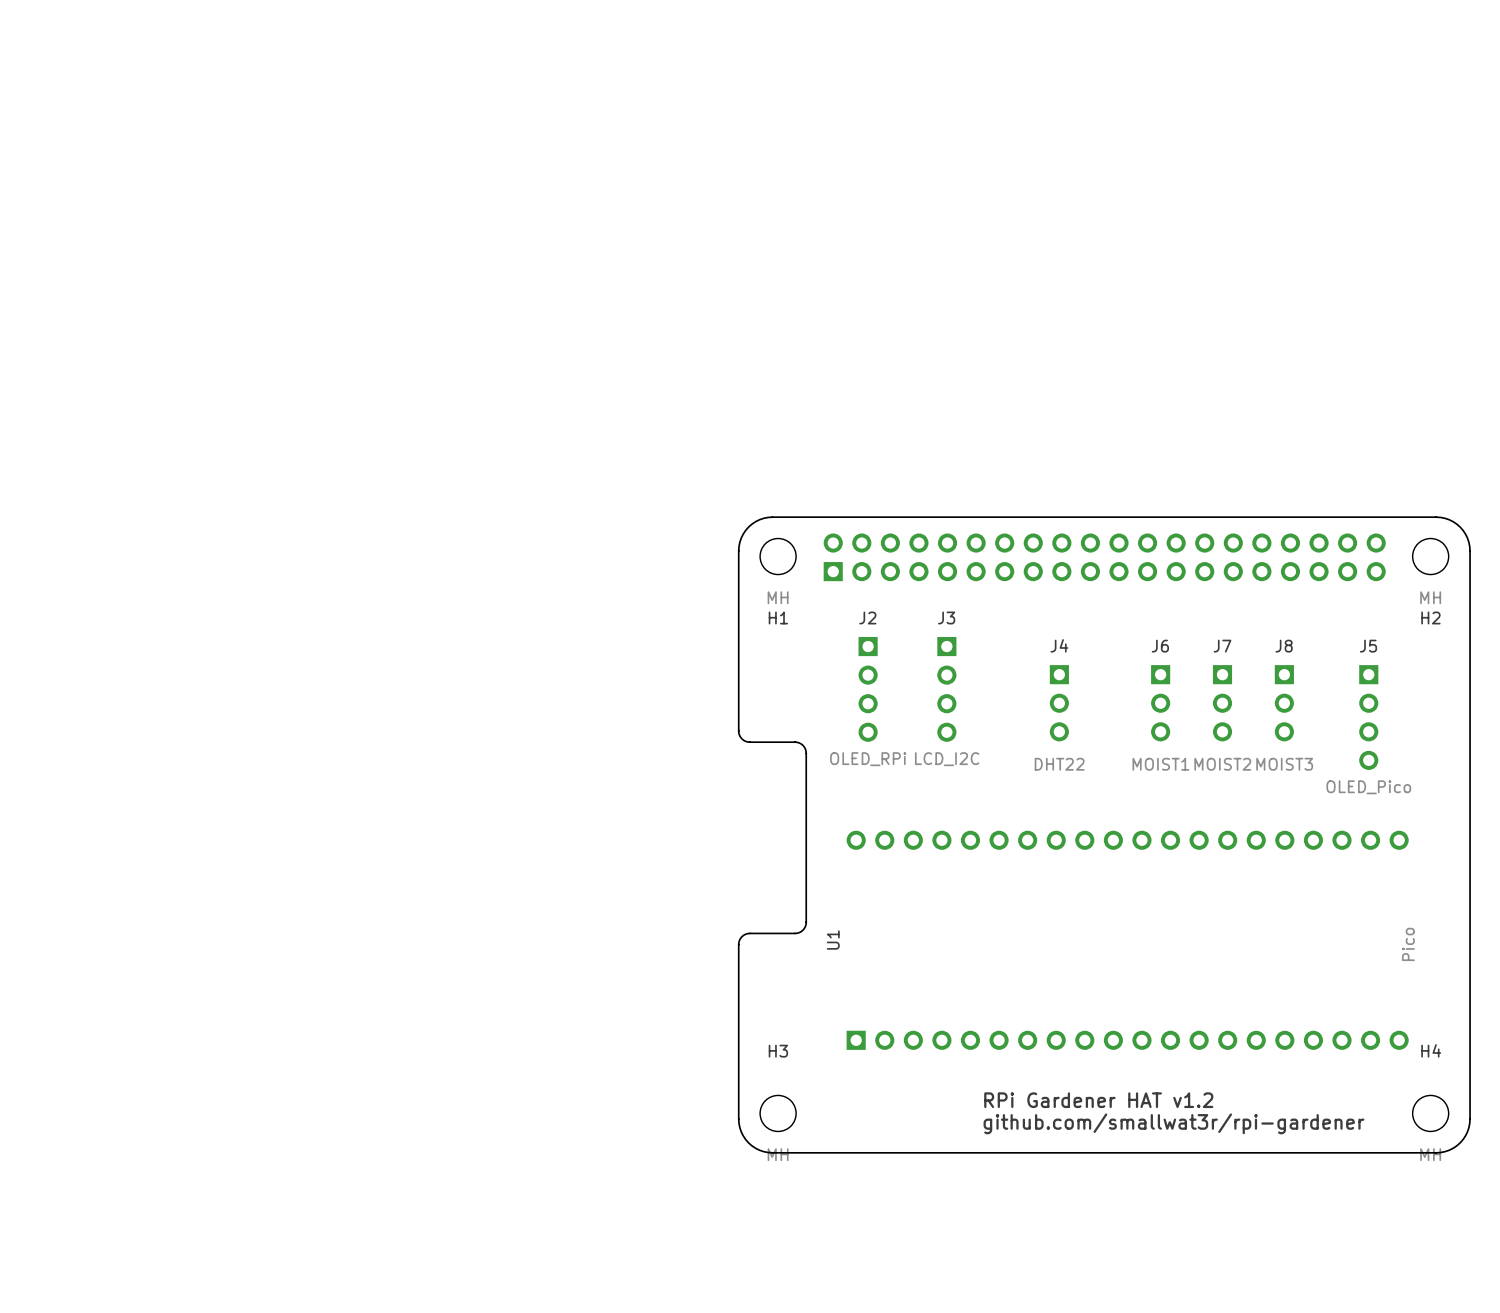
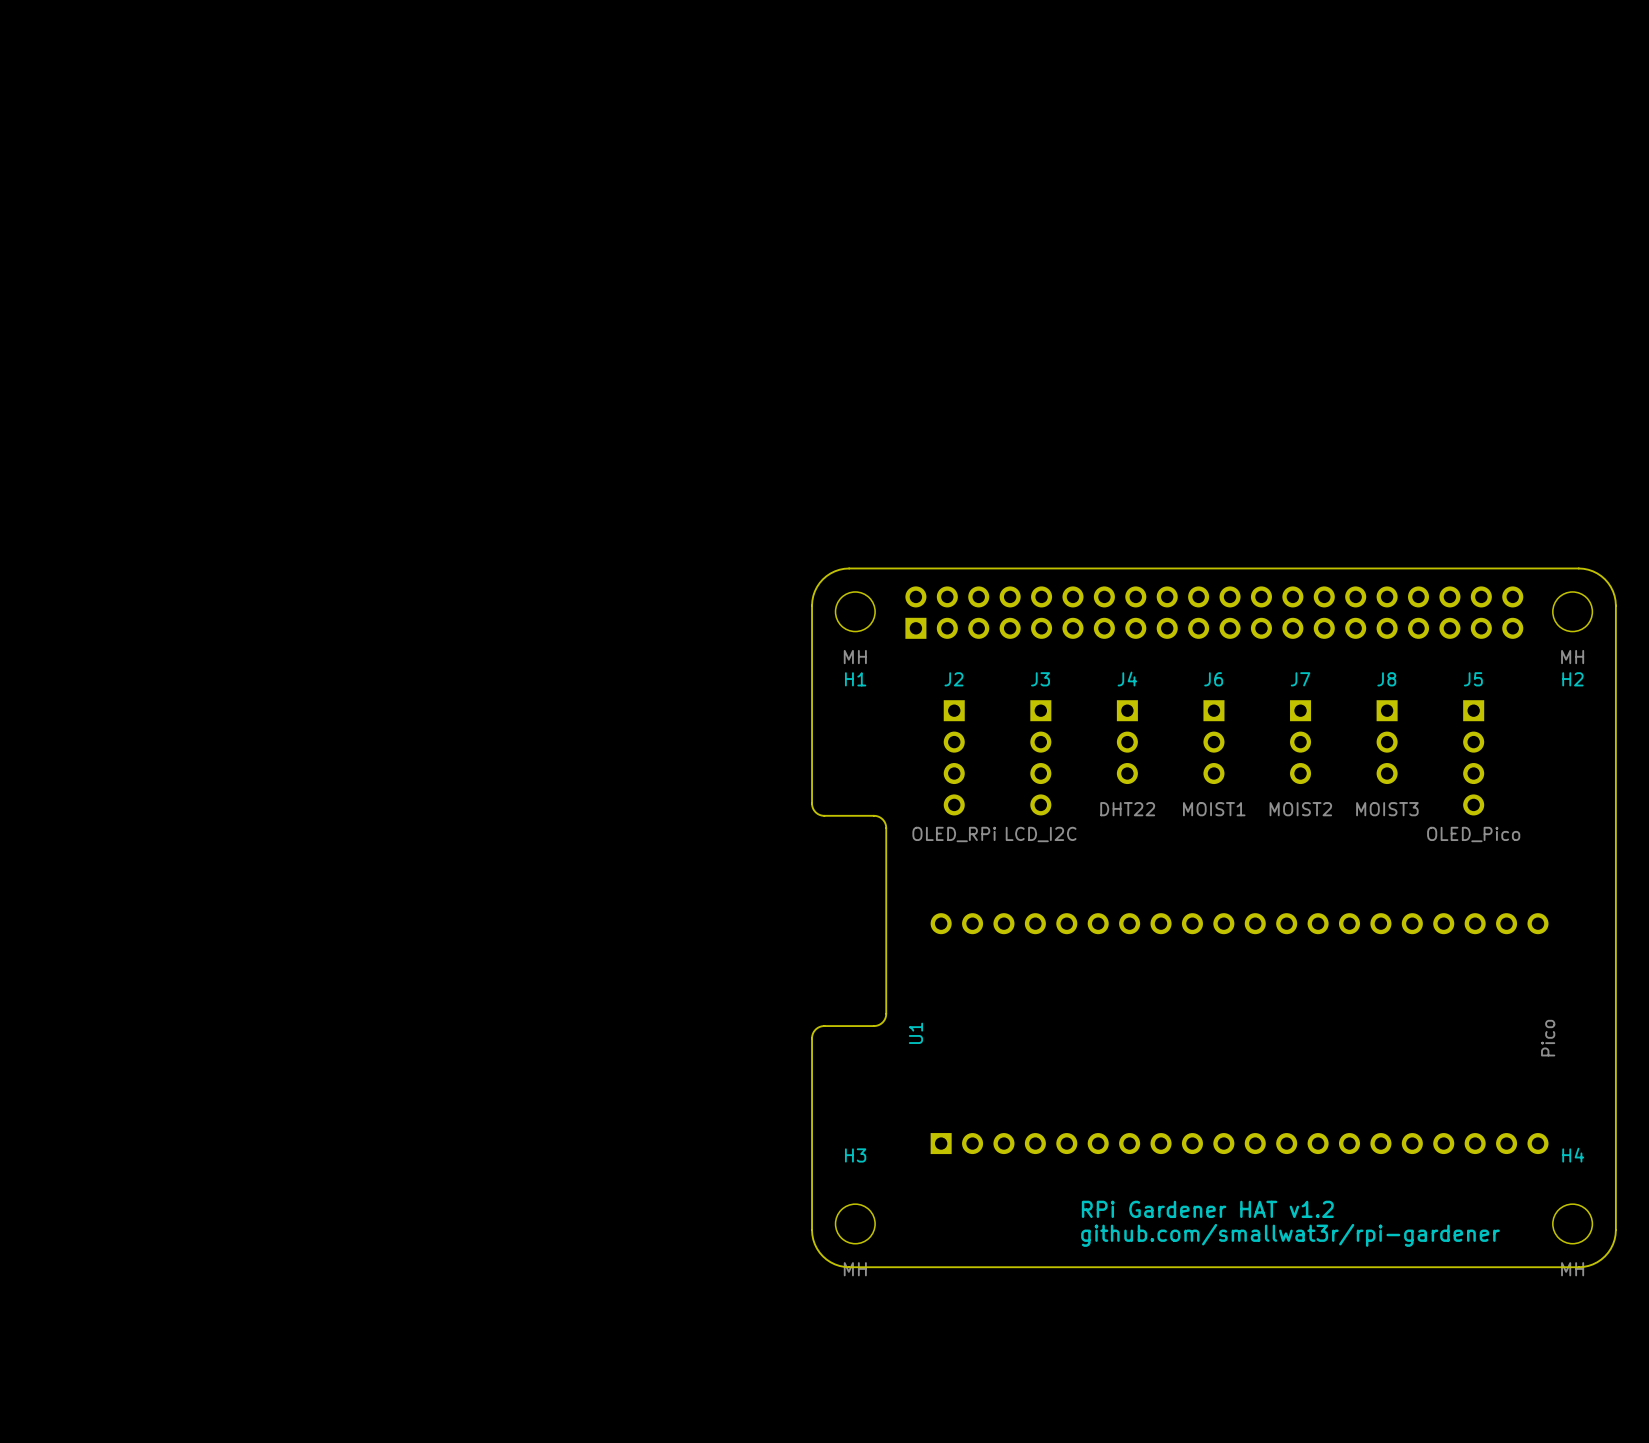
J4 position: (1059, 703) -> (1127, 742)
J6 position: (1160, 703) -> (1213, 742)
J7 position: (1222, 703) -> (1300, 742)
J8 position: (1284, 703) -> (1387, 742)
J5 position: (1368, 717) -> (1473, 757)

